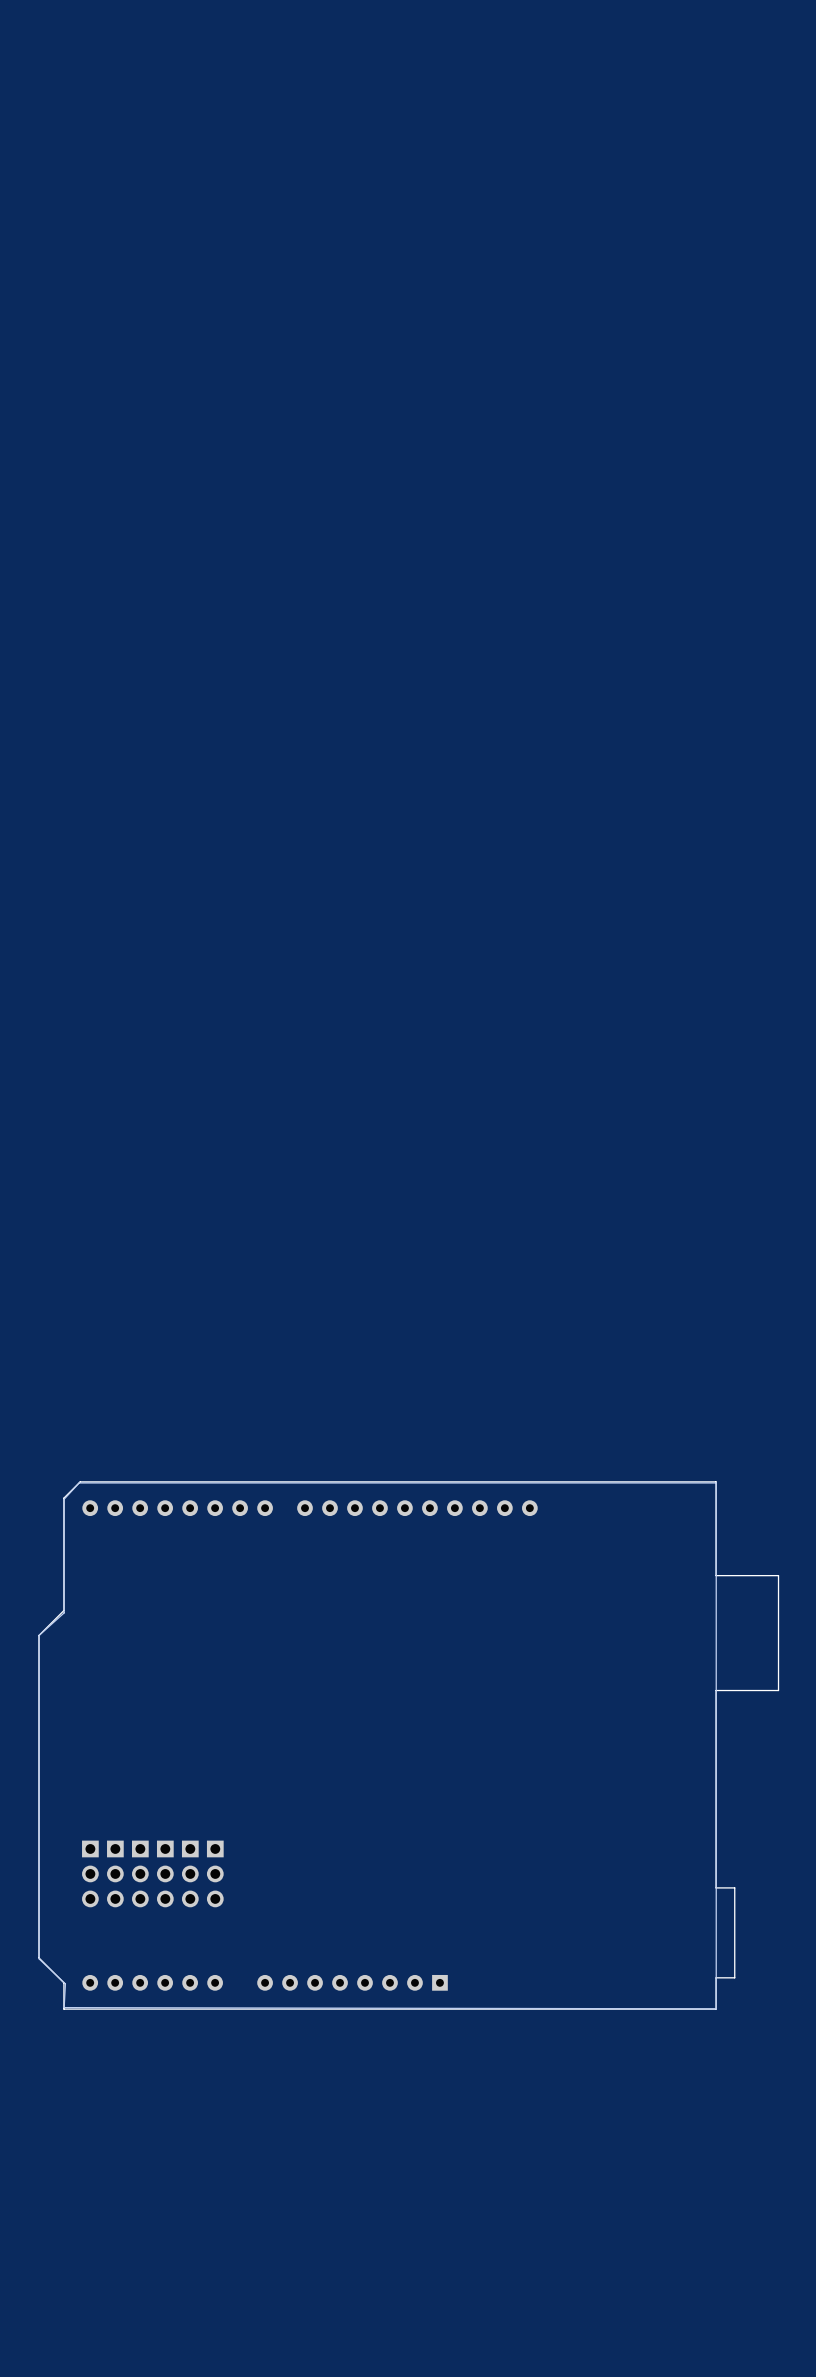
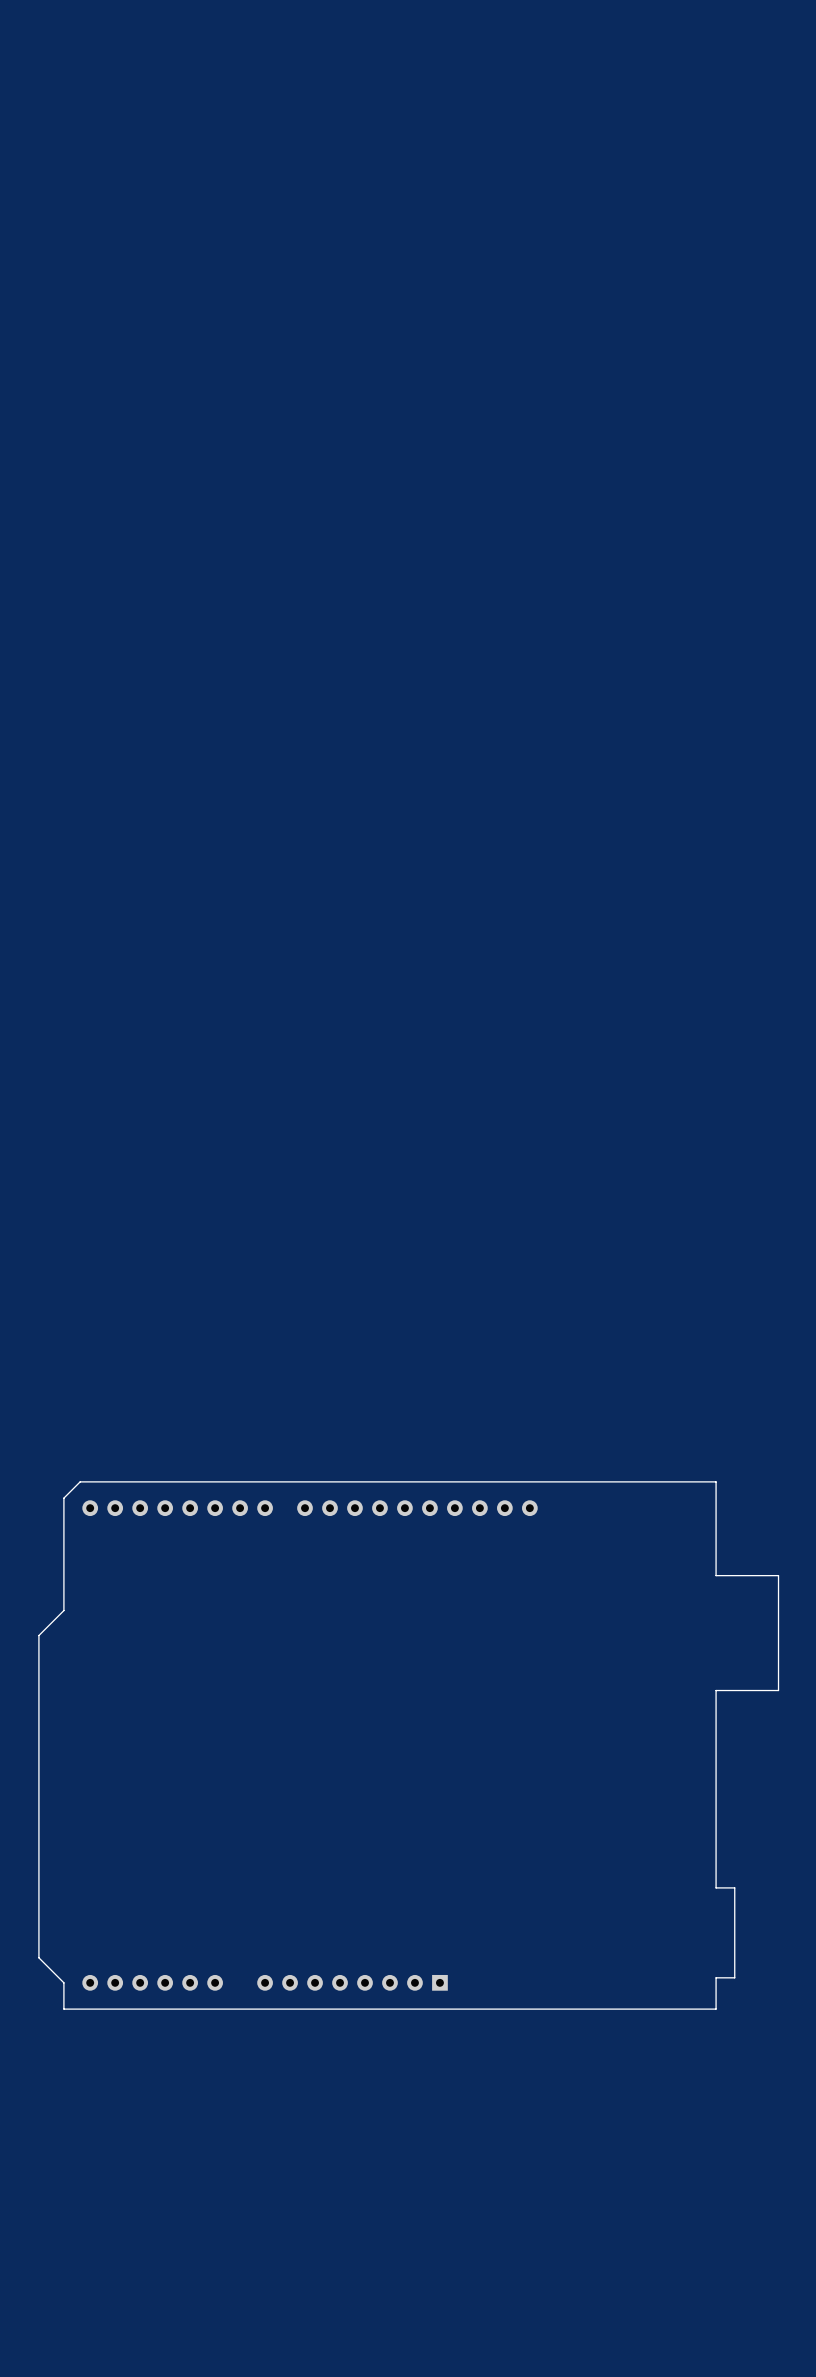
board edge: (716, 1482) (716, 2008) (64, 2007) (65, 1983) (39, 1958) (39, 1635) (64, 1612) (64, 1499) (79, 1482) (716, 1482) -> none
part: (90, 1873) -> none
part: (115, 1873) -> none
part: (140, 1873) -> none
part: (165, 1873) -> none
part: (190, 1873) -> none
part: (215, 1873) -> none

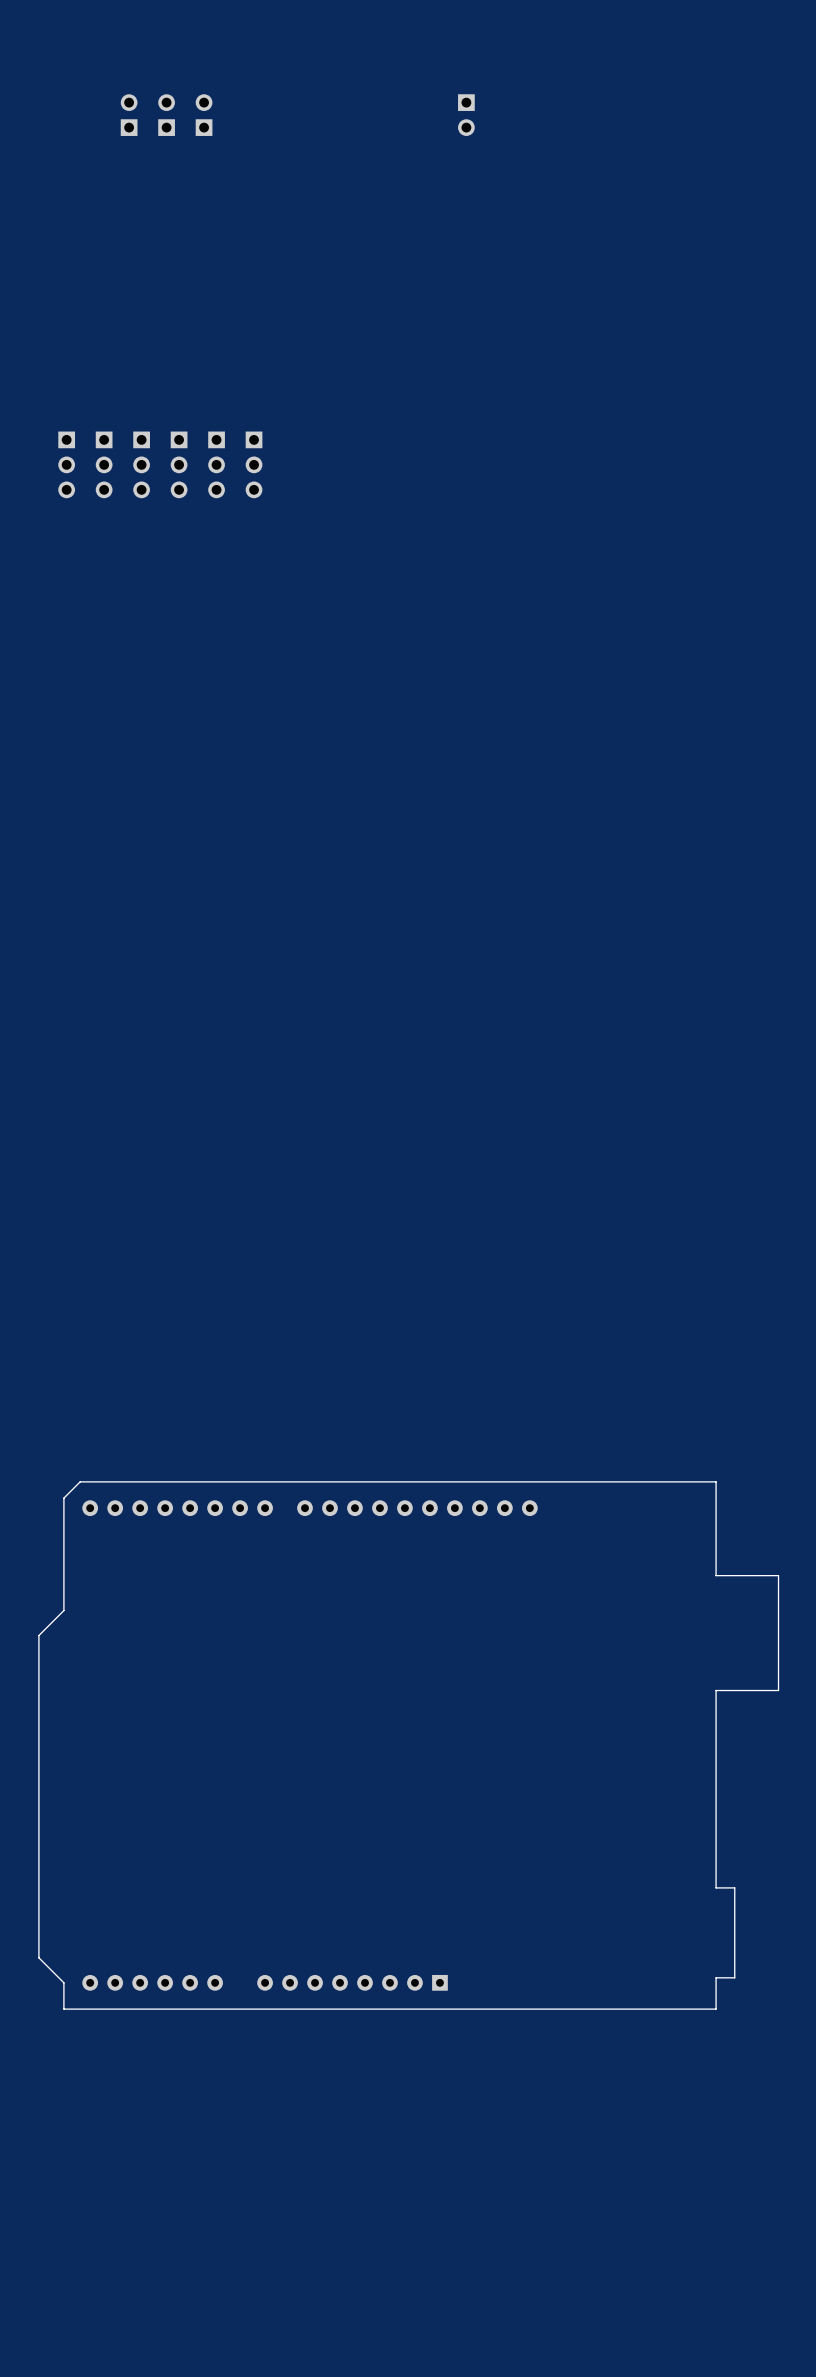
part: none -> (129, 115)
part: none -> (166, 115)
part: none -> (204, 115)
part: none -> (466, 115)
part: none -> (66, 464)
part: none -> (104, 464)
part: none -> (141, 464)
part: none -> (179, 464)
part: none -> (216, 464)
part: none -> (254, 464)

